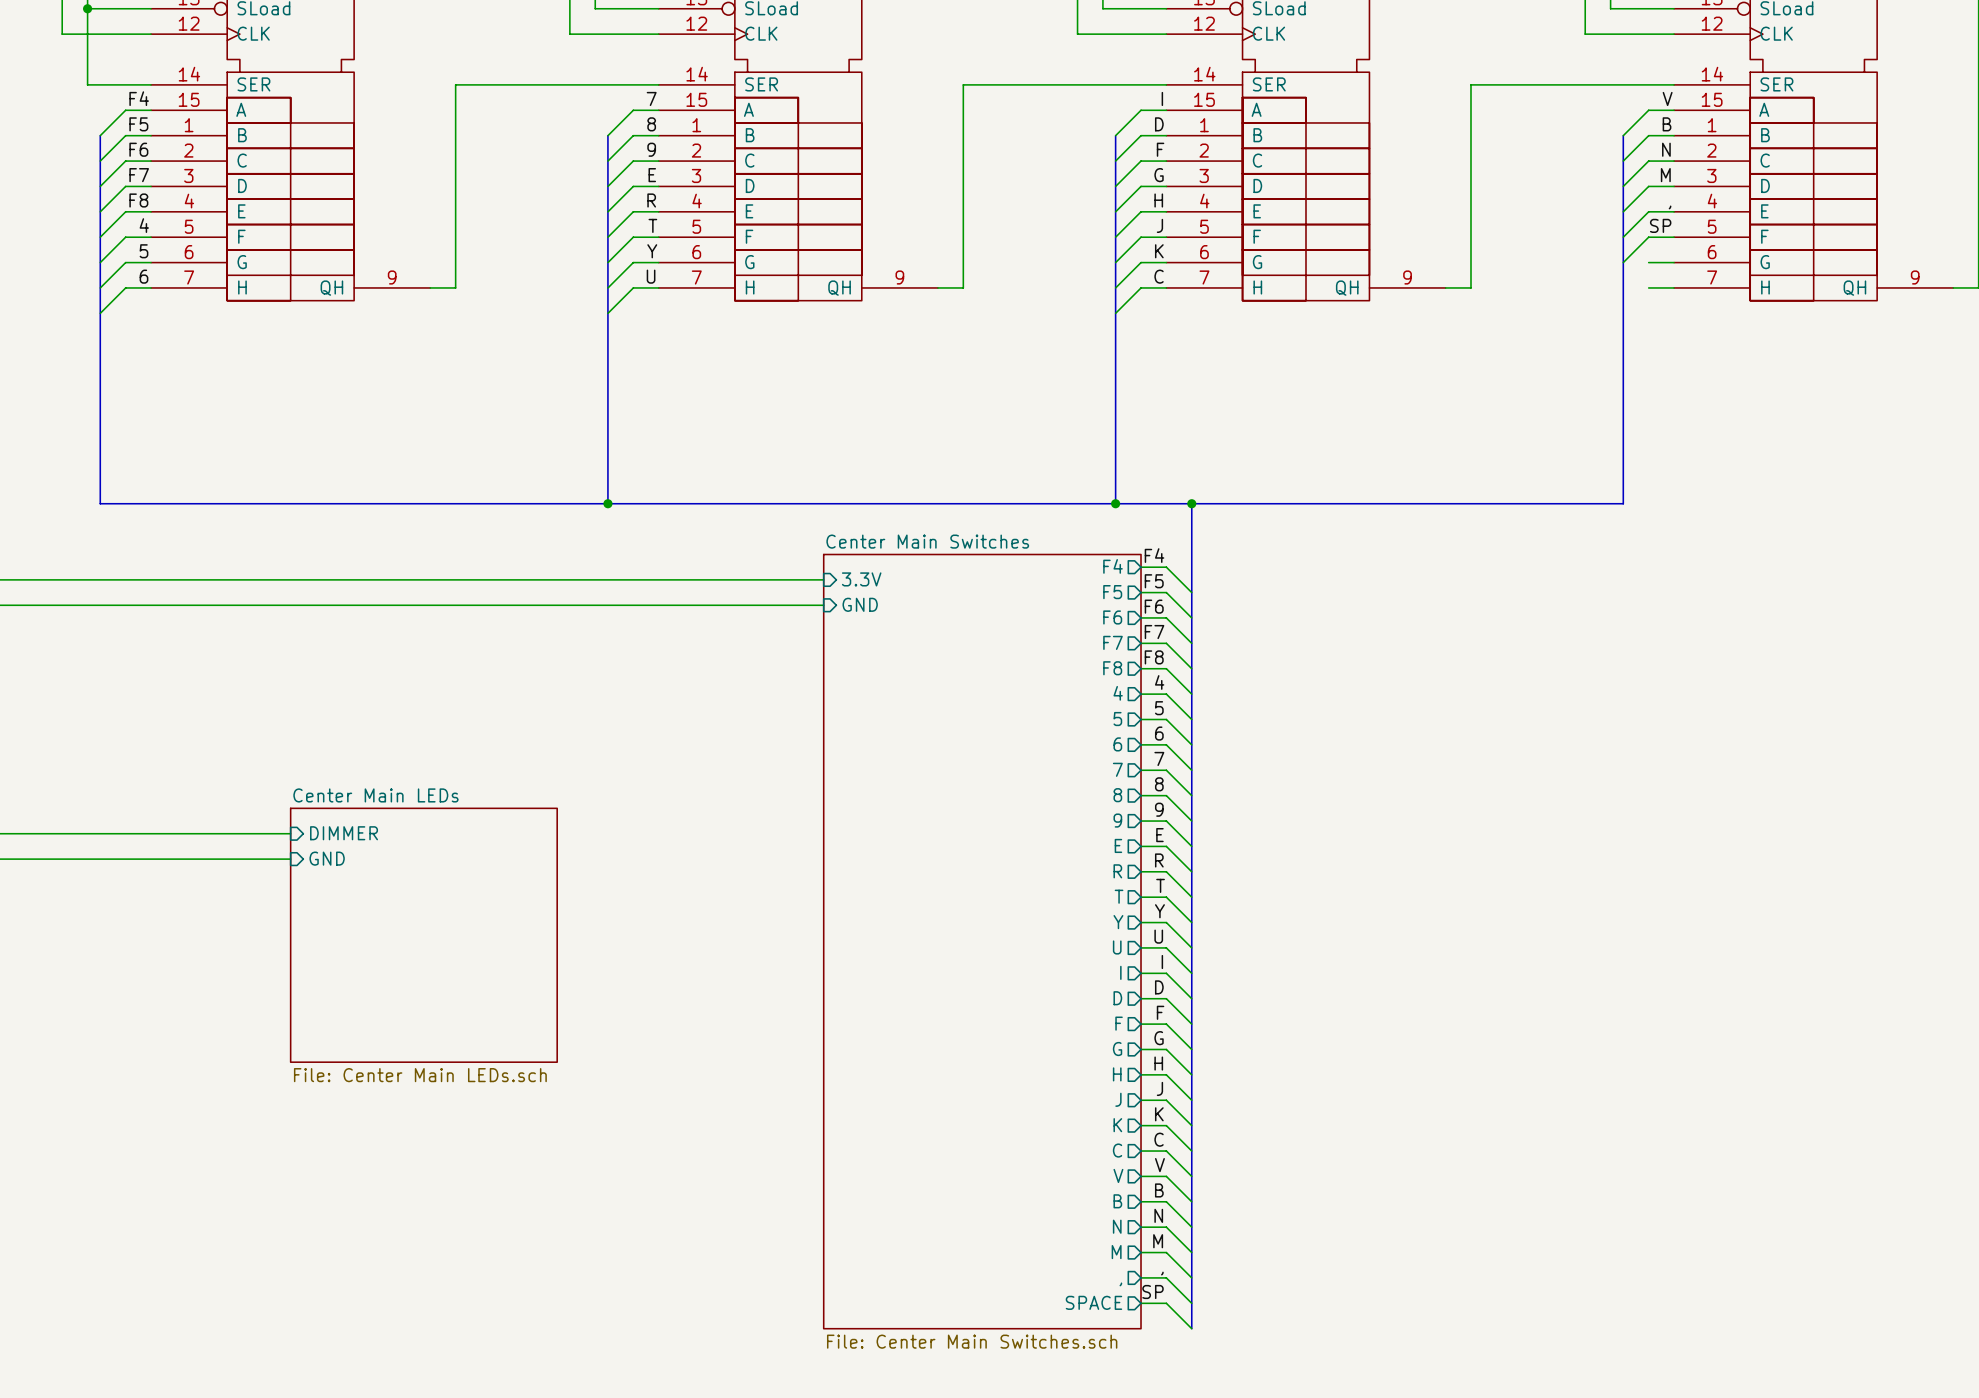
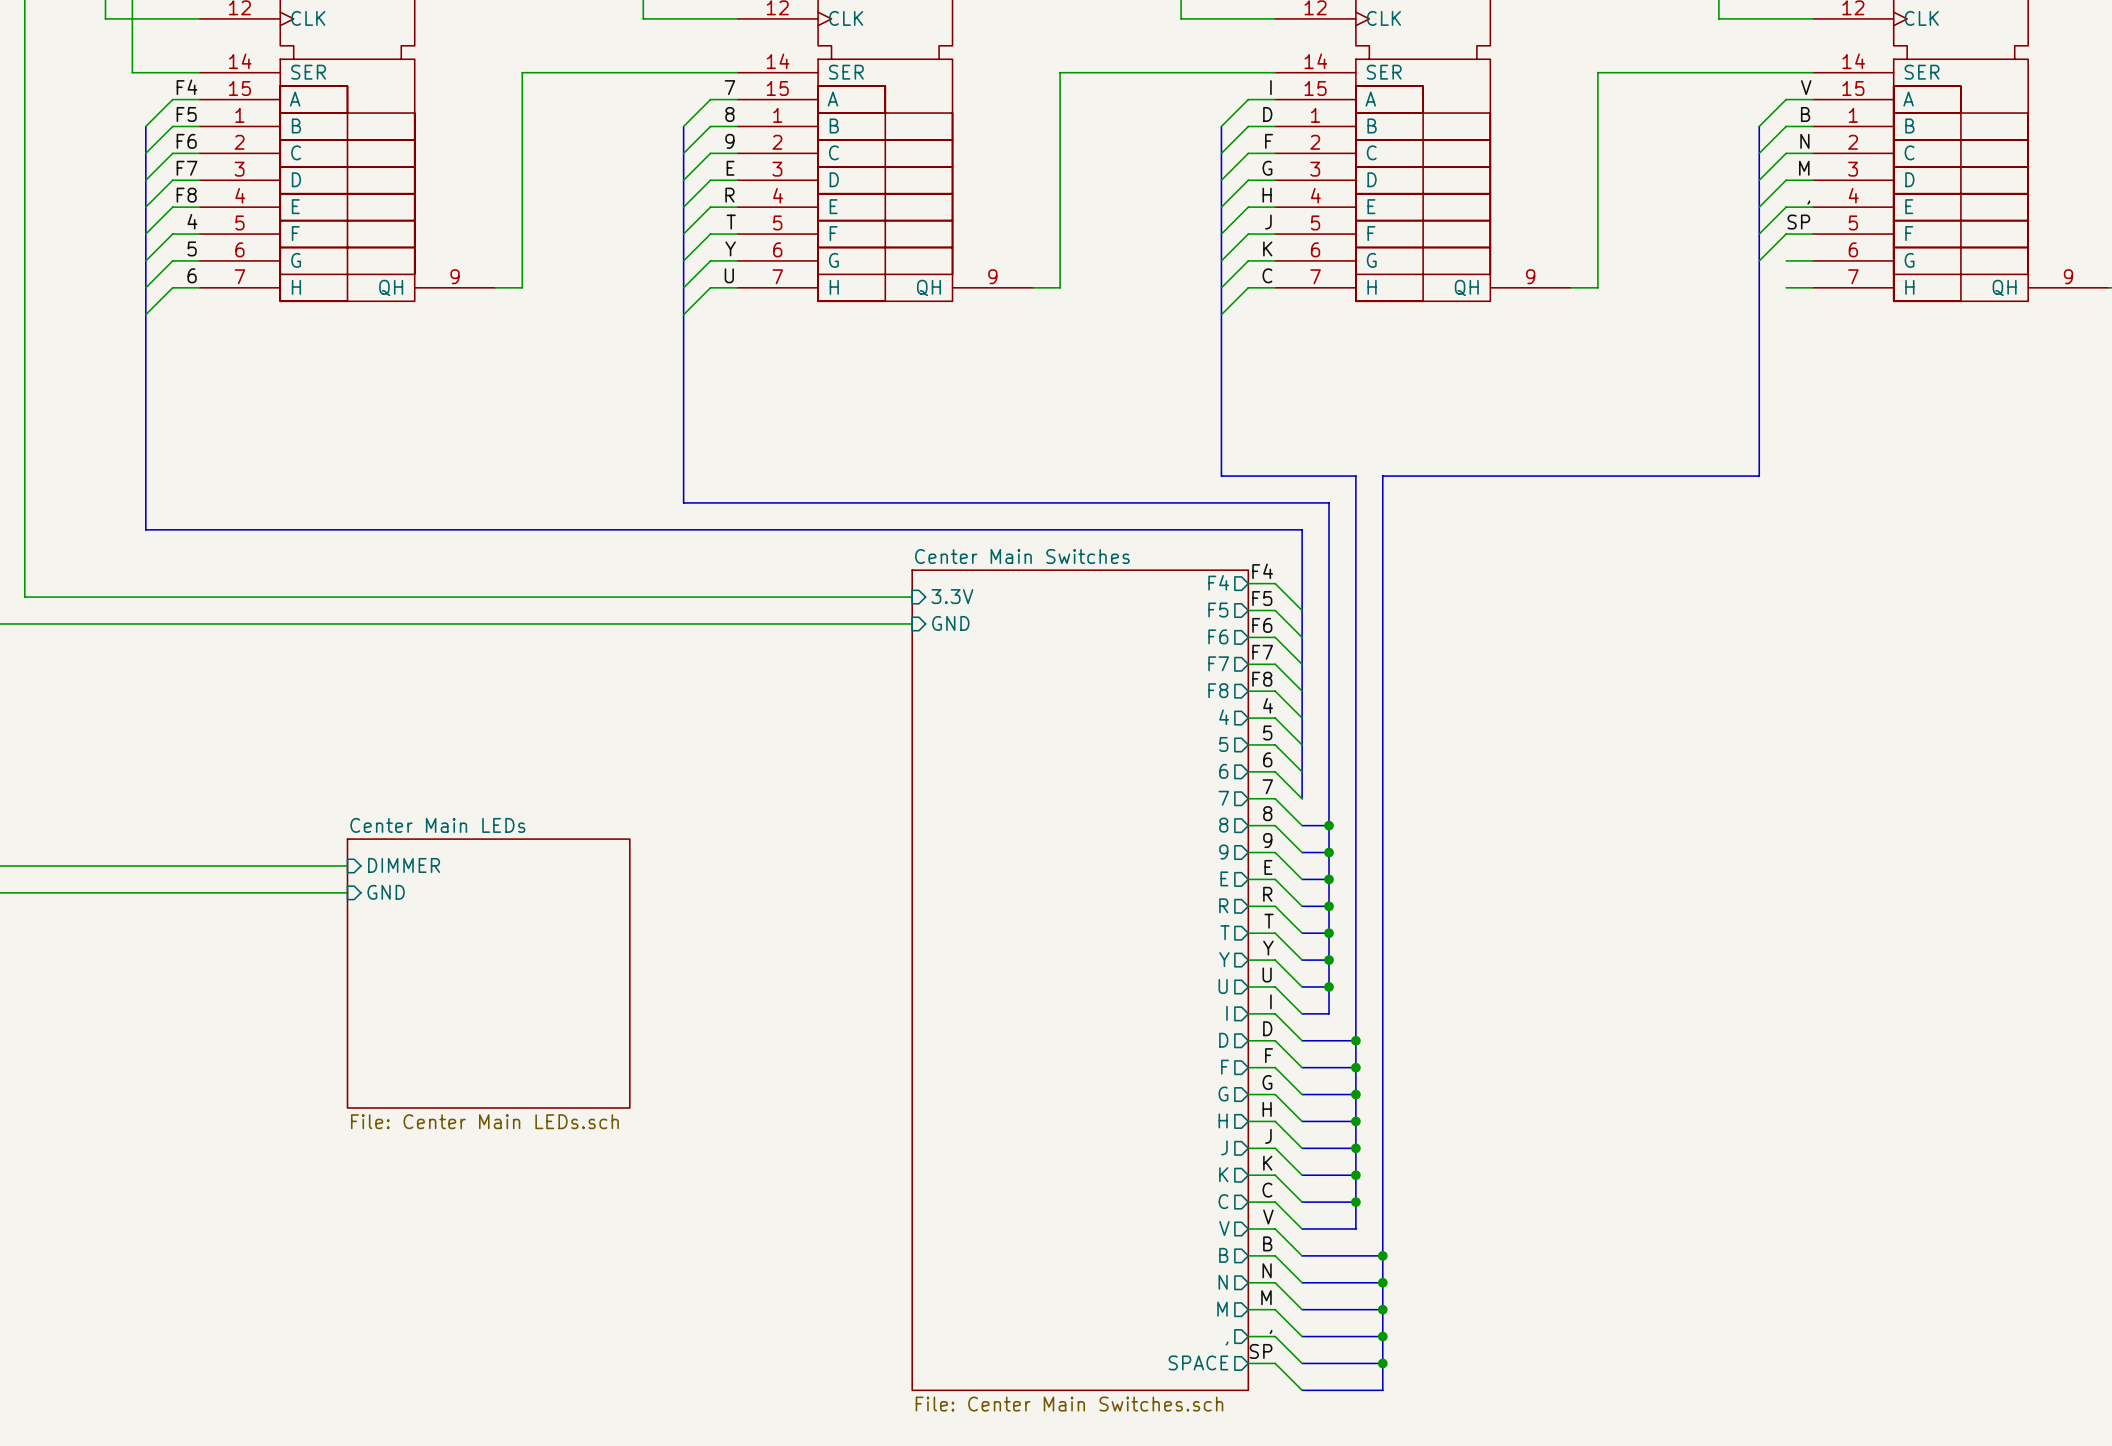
bus: (1115, 465) (1115, 503) -> (1221, 476) (1355, 476) (1355, 1229) (1302, 1229)
bus: (1623, 465) (1623, 503) (100, 503) -> (1302, 529) (145, 529) (145, 516)
bus: (607, 491) (607, 503) -> (683, 502) (1329, 502) (1329, 1013) (1302, 1013)
junction: (607, 503) -> none
junction: (1115, 503) -> none
bus: (1191, 503) (1191, 516) -> none
junction: (1191, 503) -> none
bus: (1191, 770) (1191, 1328) -> (1759, 476) (1382, 476) (1382, 1390) (1302, 1390)
bus: none -> (1302, 825) (1329, 825)
junction: none -> (1329, 825)
bus: none -> (1302, 852) (1329, 852)
junction: none -> (1329, 852)
bus: none -> (1302, 879) (1329, 879)
junction: none -> (1329, 879)
bus: none -> (1302, 906) (1329, 906)
junction: none -> (1329, 906)
bus: none -> (1302, 933) (1329, 933)
junction: none -> (1329, 933)
bus: none -> (1302, 960) (1329, 960)
junction: none -> (1329, 960)
bus: none -> (1302, 986) (1329, 986)
junction: none -> (1329, 986)
bus: none -> (1302, 1040) (1355, 1040)
junction: none -> (1355, 1040)
bus: none -> (1302, 1067) (1355, 1067)
junction: none -> (1355, 1067)
bus: none -> (1302, 1094) (1355, 1094)
junction: none -> (1355, 1094)
bus: none -> (1302, 1121) (1355, 1121)
junction: none -> (1355, 1121)
bus: none -> (1302, 1148) (1355, 1148)
junction: none -> (1355, 1148)
bus: none -> (1302, 1175) (1355, 1175)
junction: none -> (1355, 1175)
bus: none -> (1302, 1202) (1355, 1202)
junction: none -> (1355, 1202)
bus: none -> (1302, 1255) (1382, 1255)
junction: none -> (1382, 1255)
bus: none -> (1302, 1282) (1382, 1282)
junction: none -> (1382, 1282)
bus: none -> (1302, 1309) (1382, 1309)
junction: none -> (1382, 1309)
bus: none -> (1302, 1336) (1382, 1336)
junction: none -> (1382, 1336)
bus: none -> (1302, 1363) (1382, 1363)
junction: none -> (1382, 1363)

